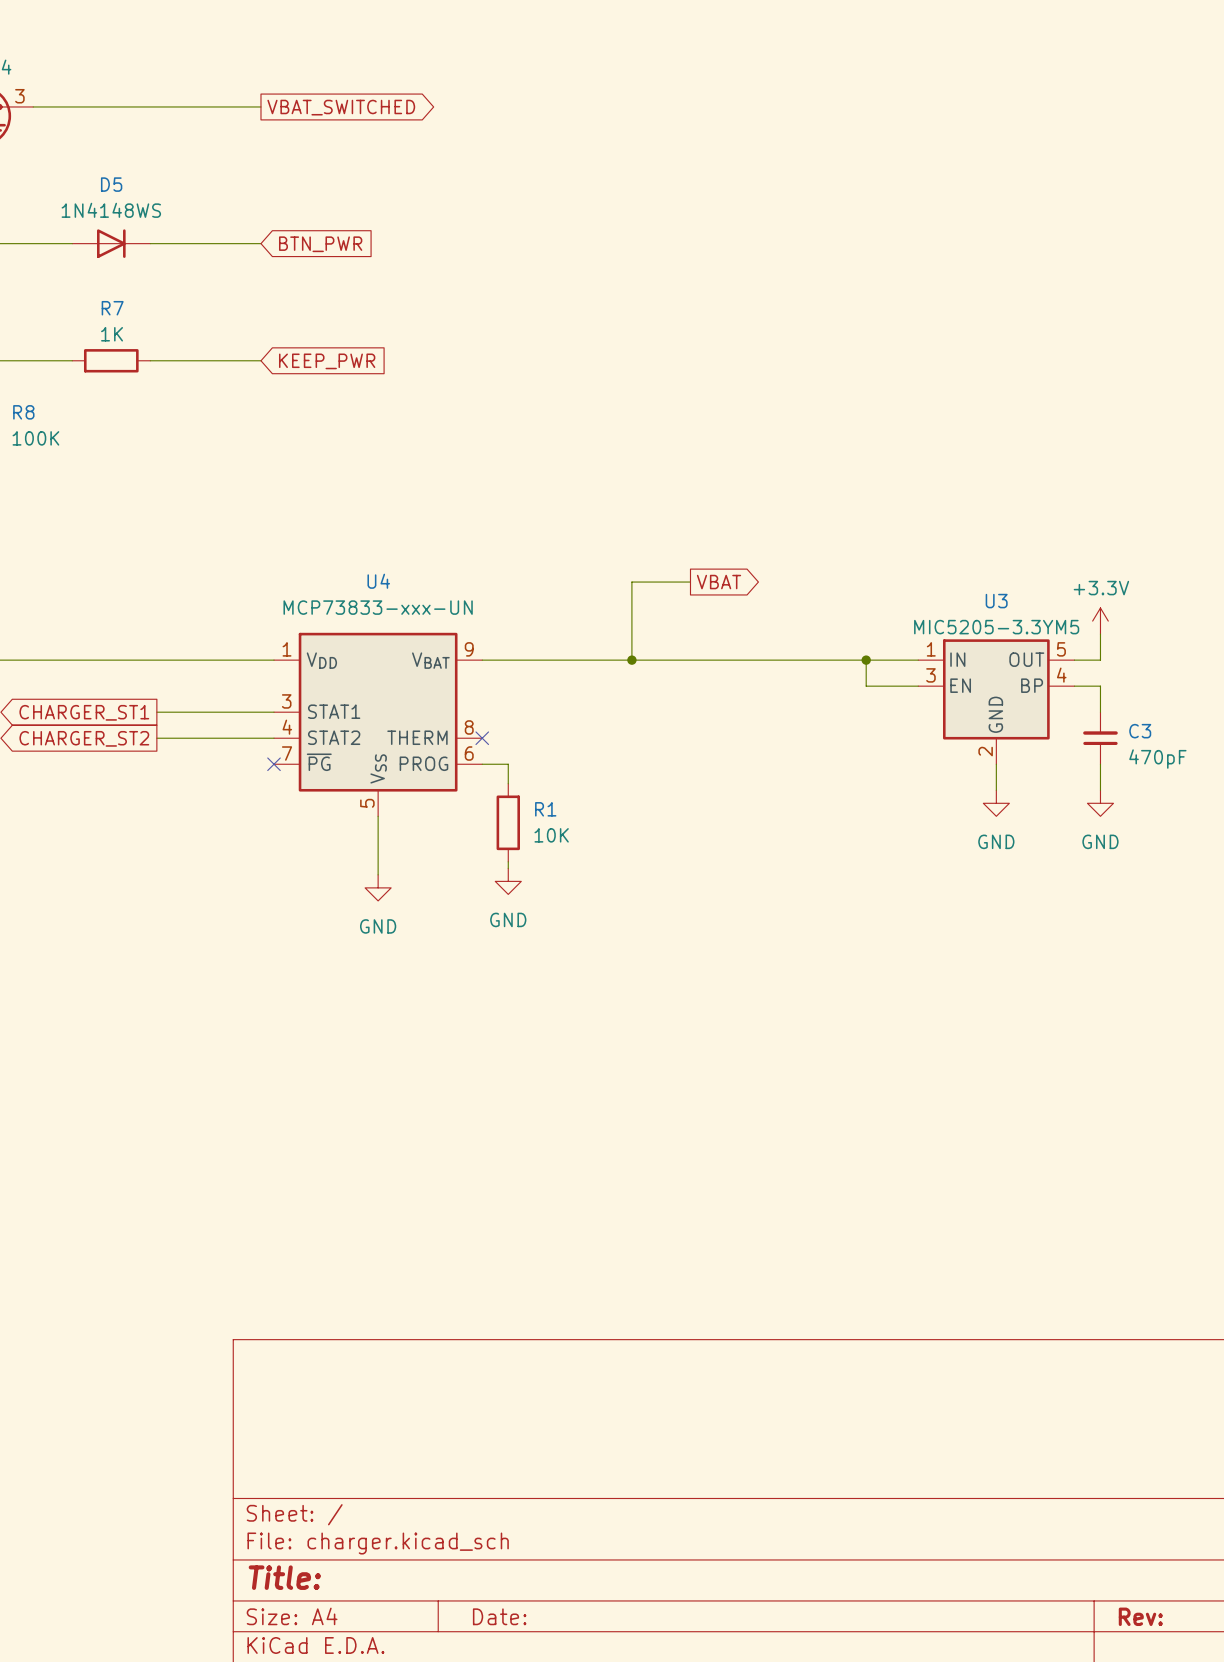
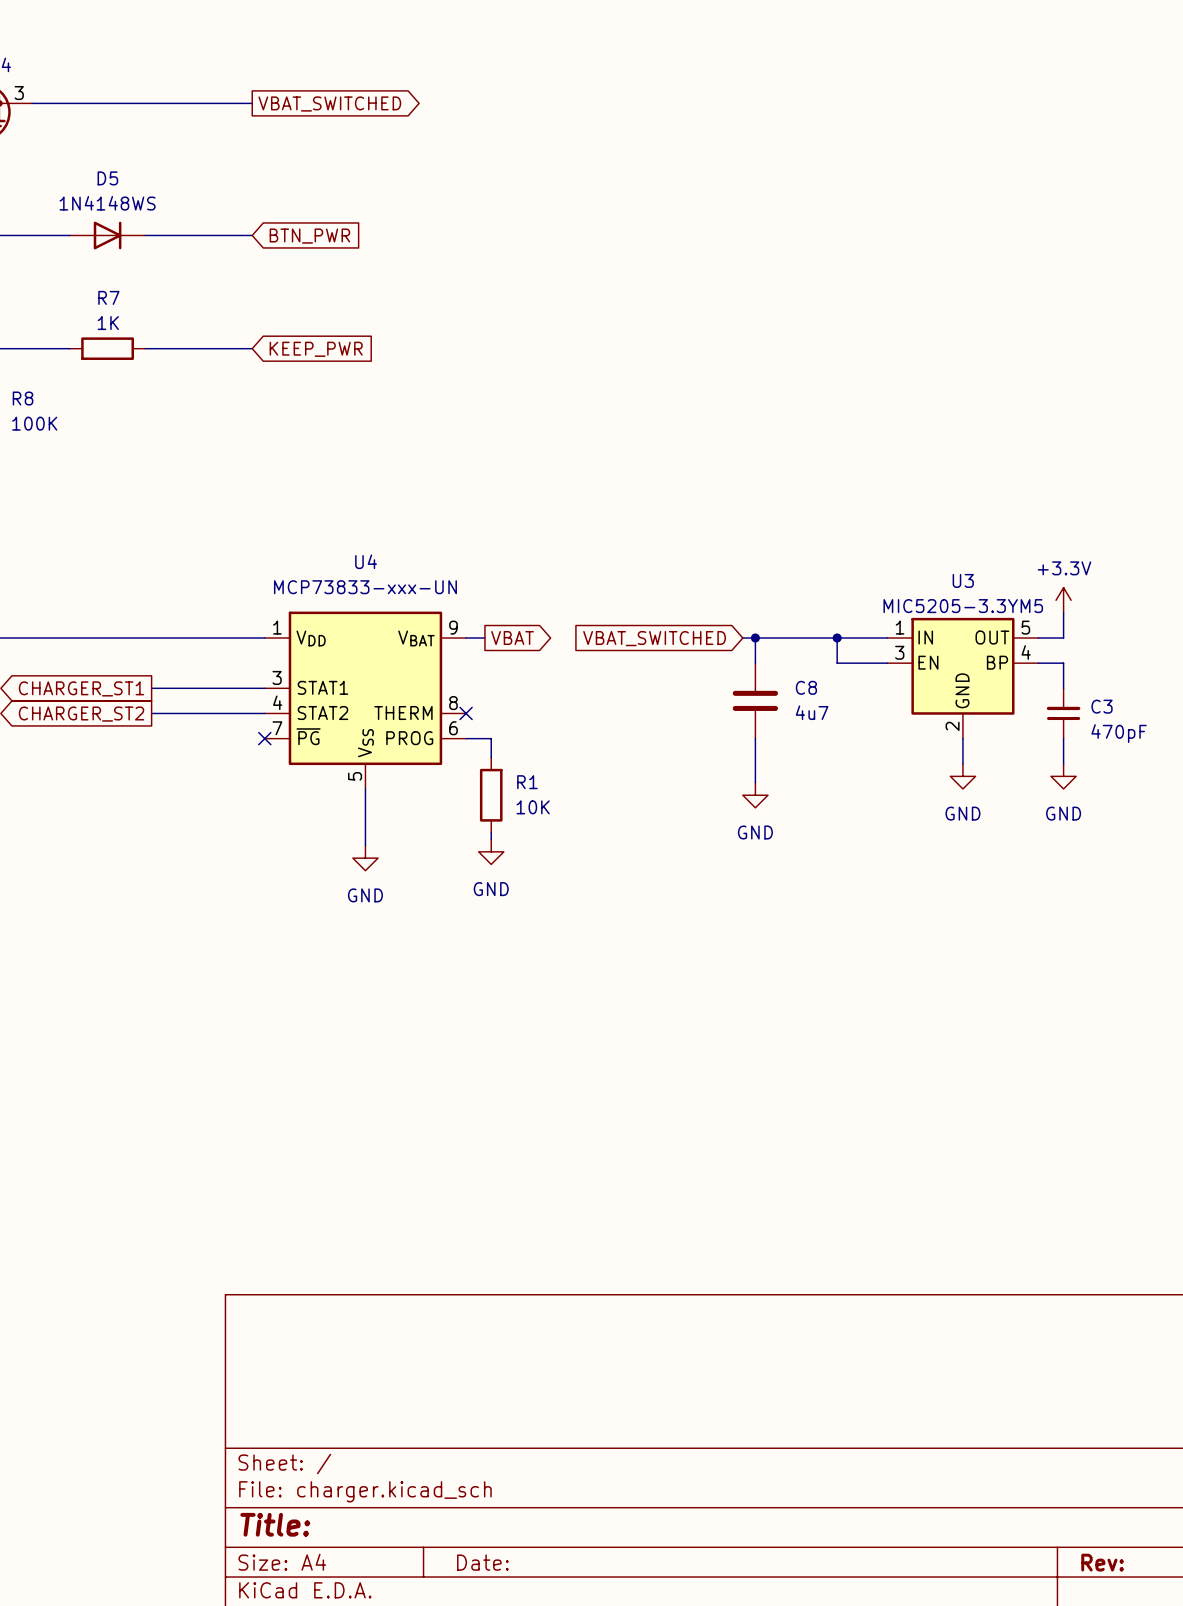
wire: (690, 582) (631, 582) (631, 660) -> none
global label position: VBAT (719, 582) -> VBAT (512, 638)
wire: (501, 660) (768, 660) -> none
junction: (631, 660) -> none
global label: none -> VBAT_SWITCHED (654, 638)
wire: none -> (755, 638) (755, 663)
junction: none -> (755, 638)
C8: none -> 4u7 (755, 700)
wire: none -> (755, 738) (755, 782)
power symbol: none -> GND (755, 795)

